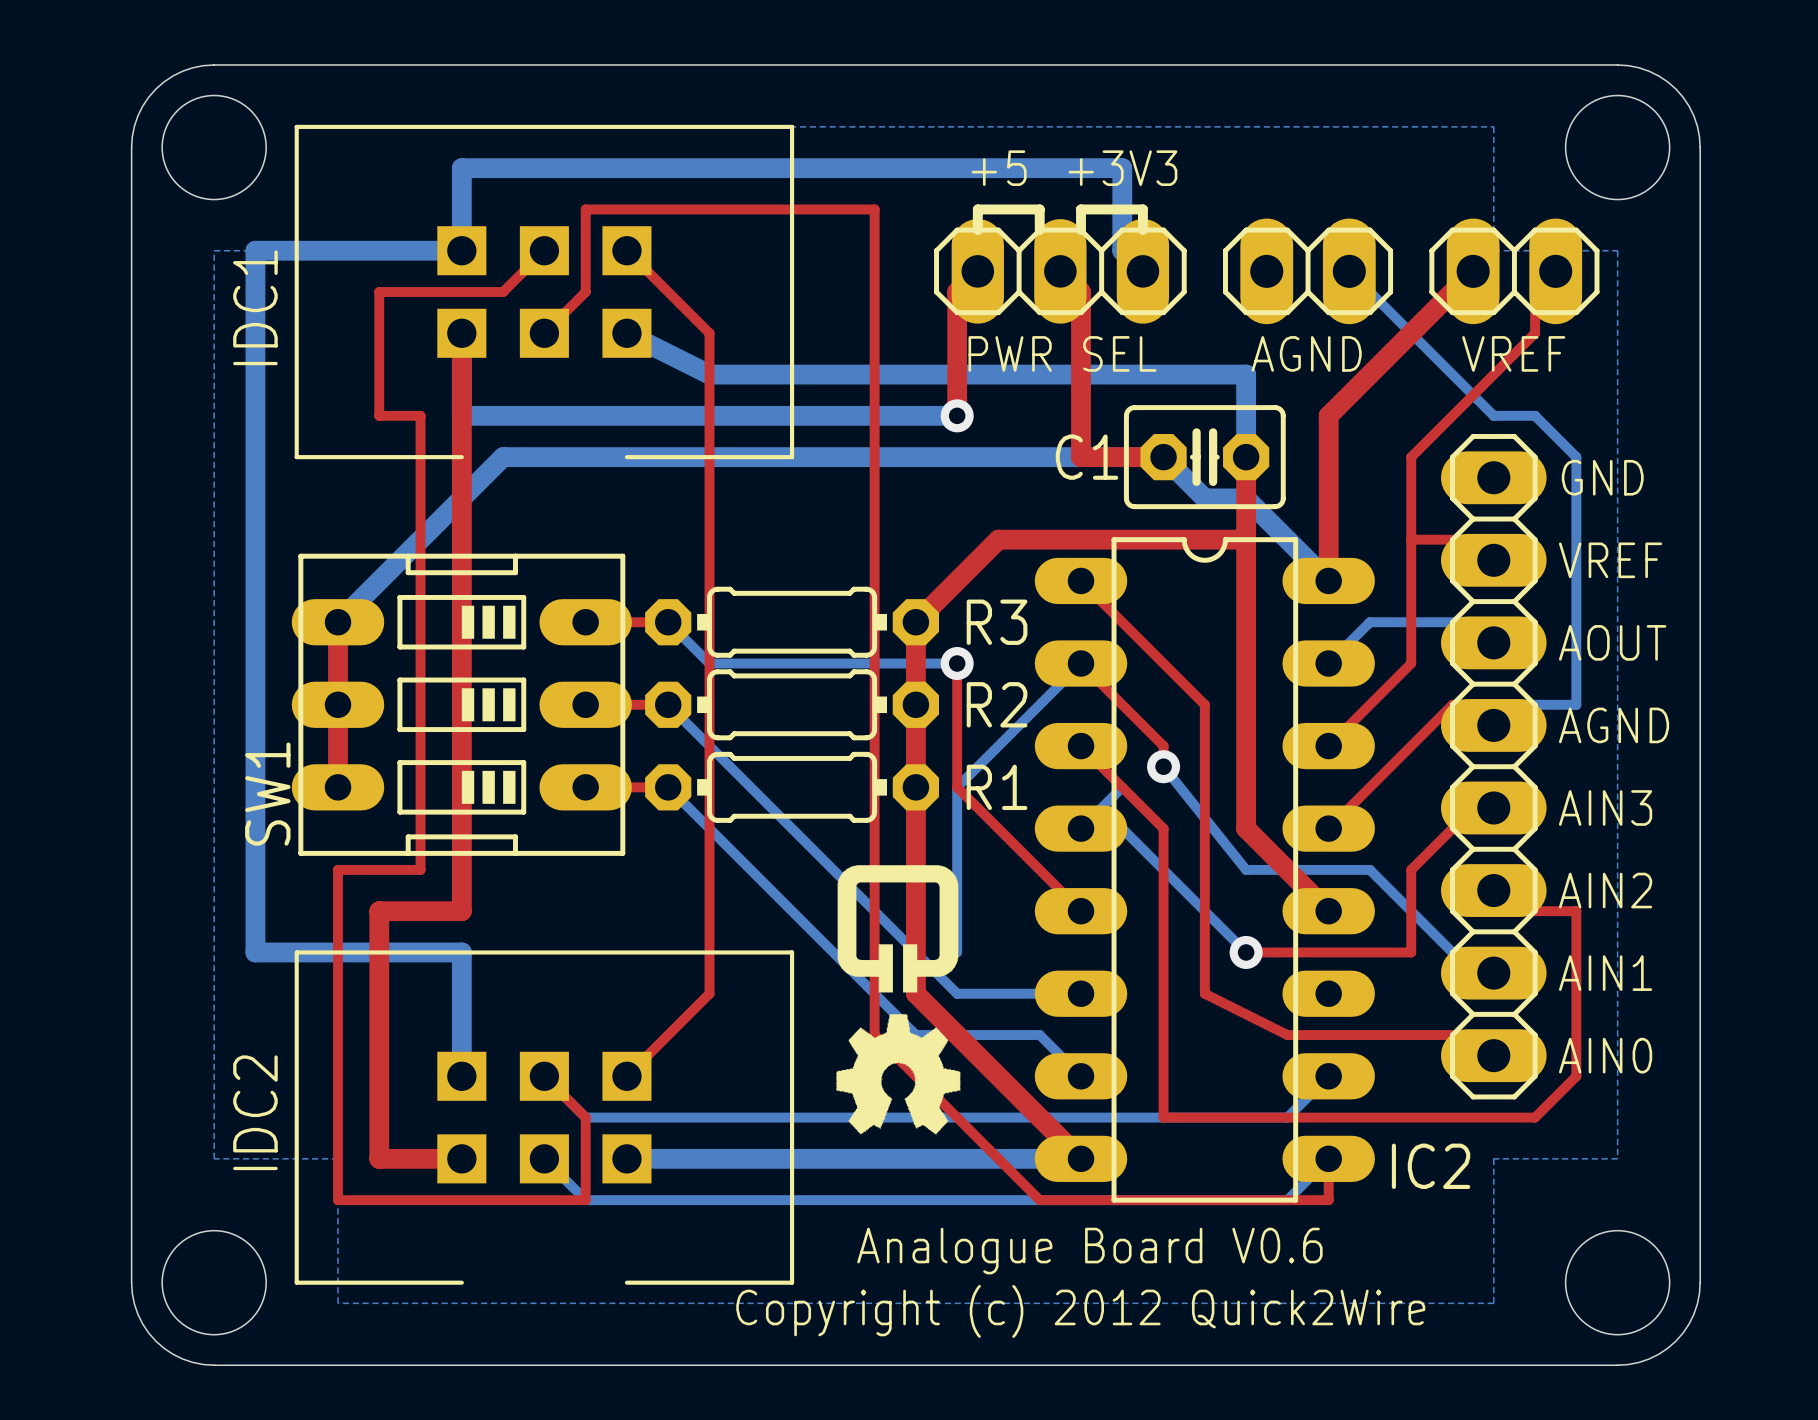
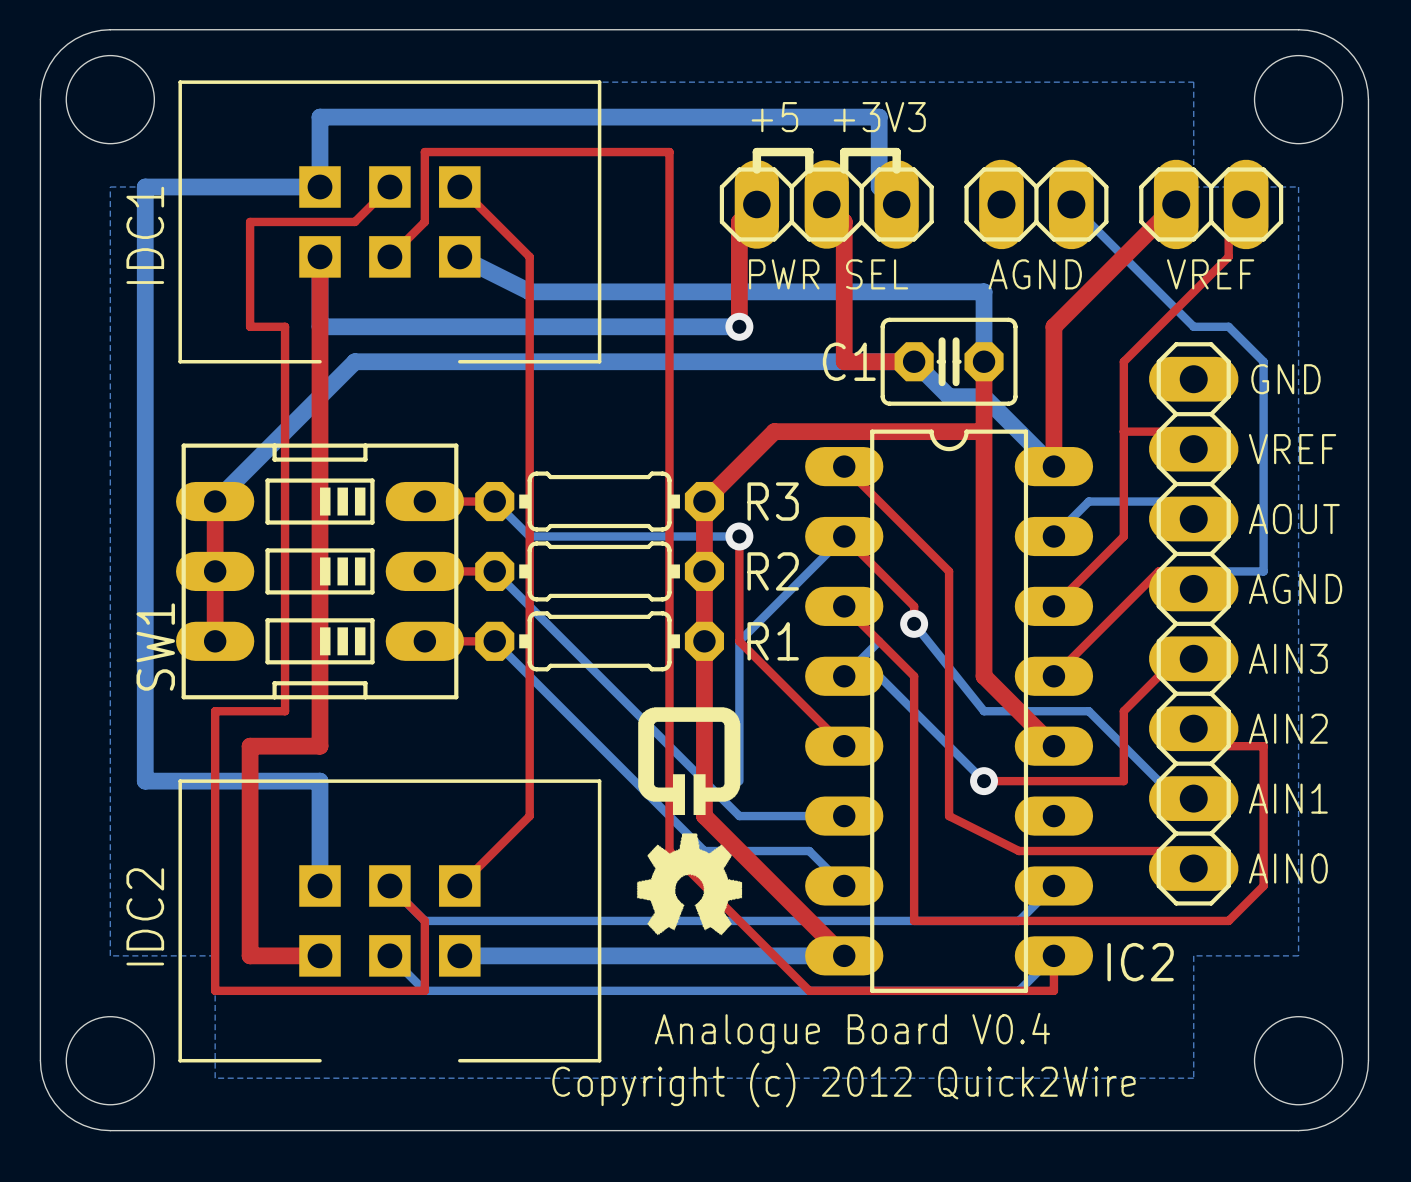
text: Analogue Board V0.6 (1089, 1251) -> Analogue Board V0.4 (852, 1033)

